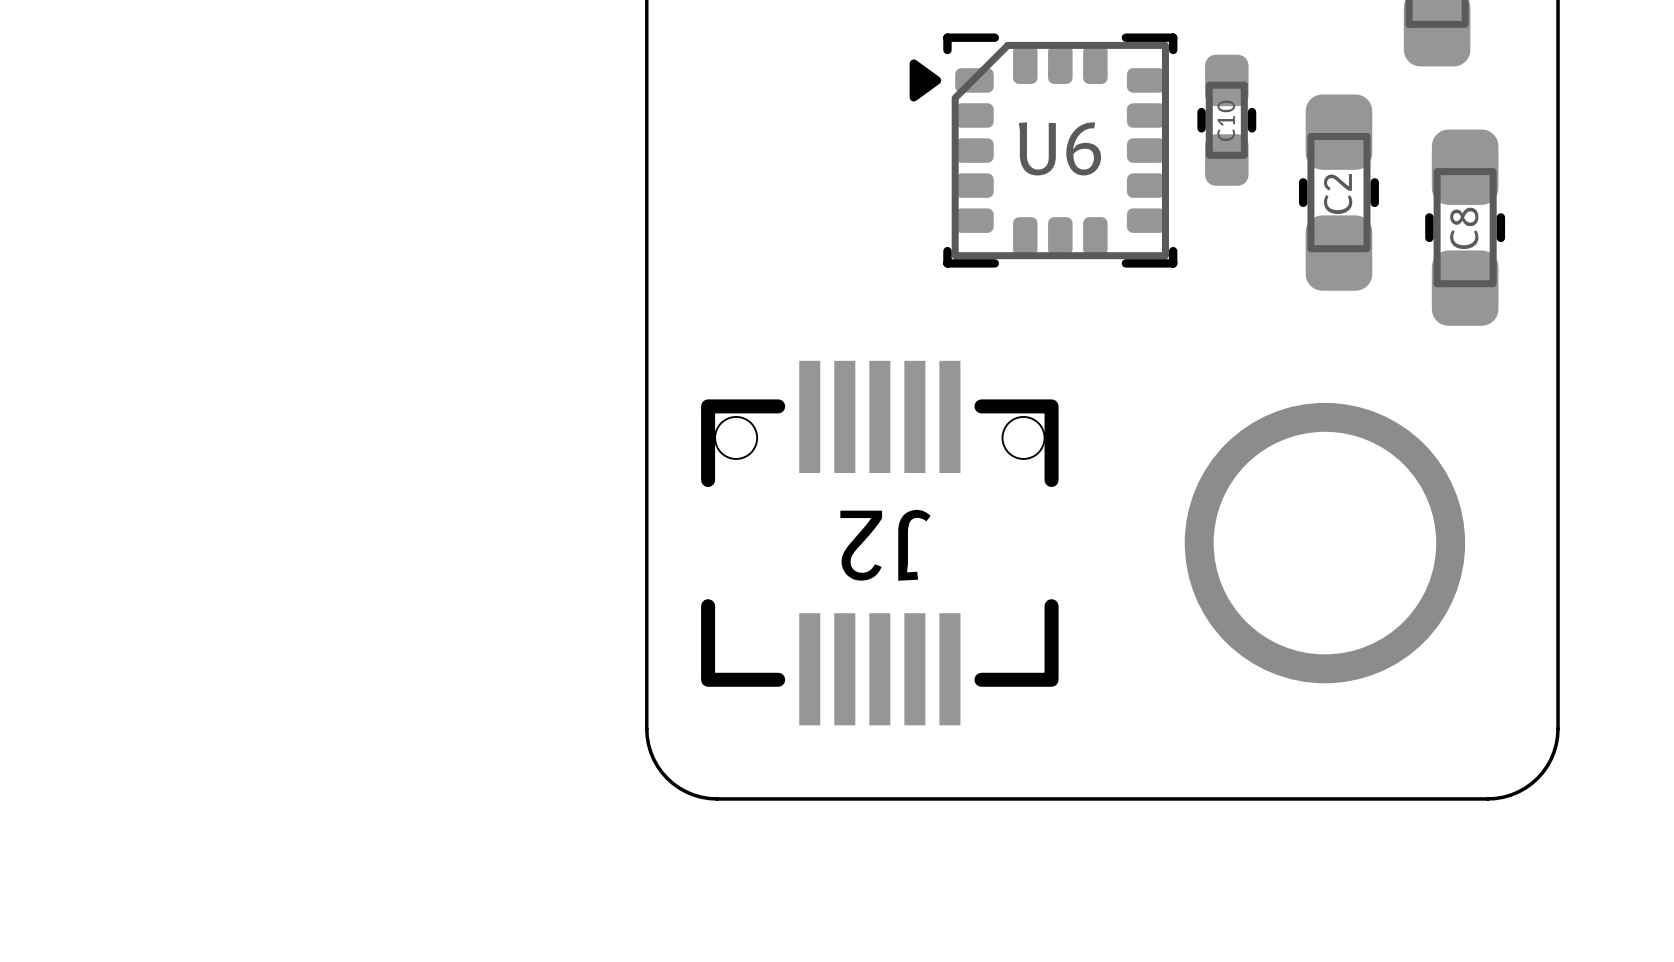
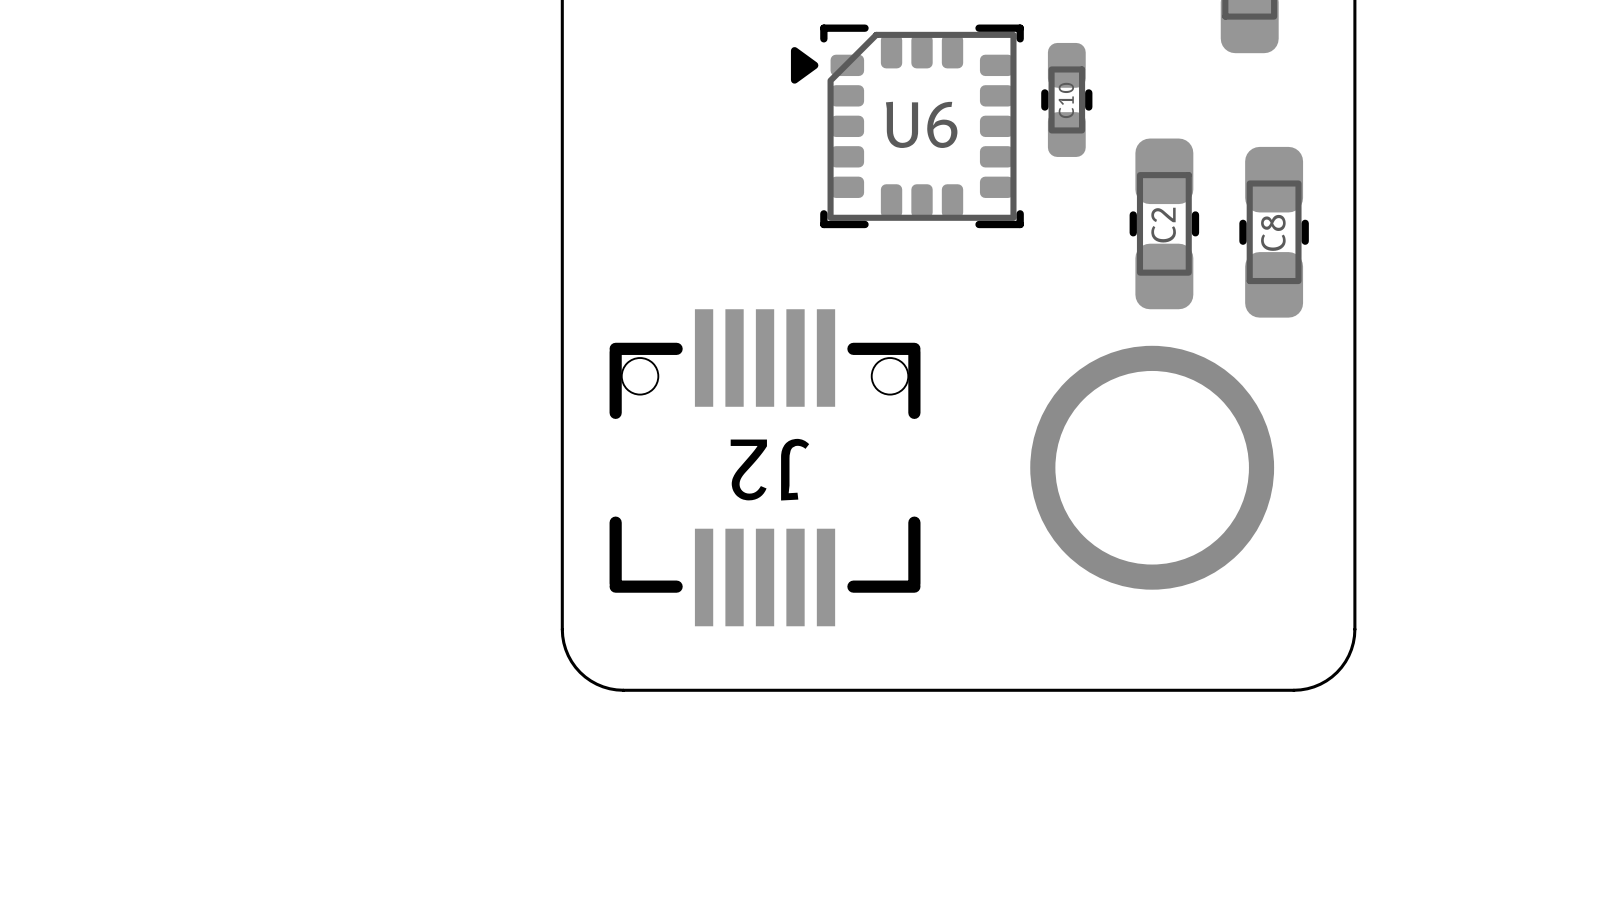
C2 position: (1338, 192) -> (1164, 223)
C8 position: (1465, 227) -> (1274, 232)

